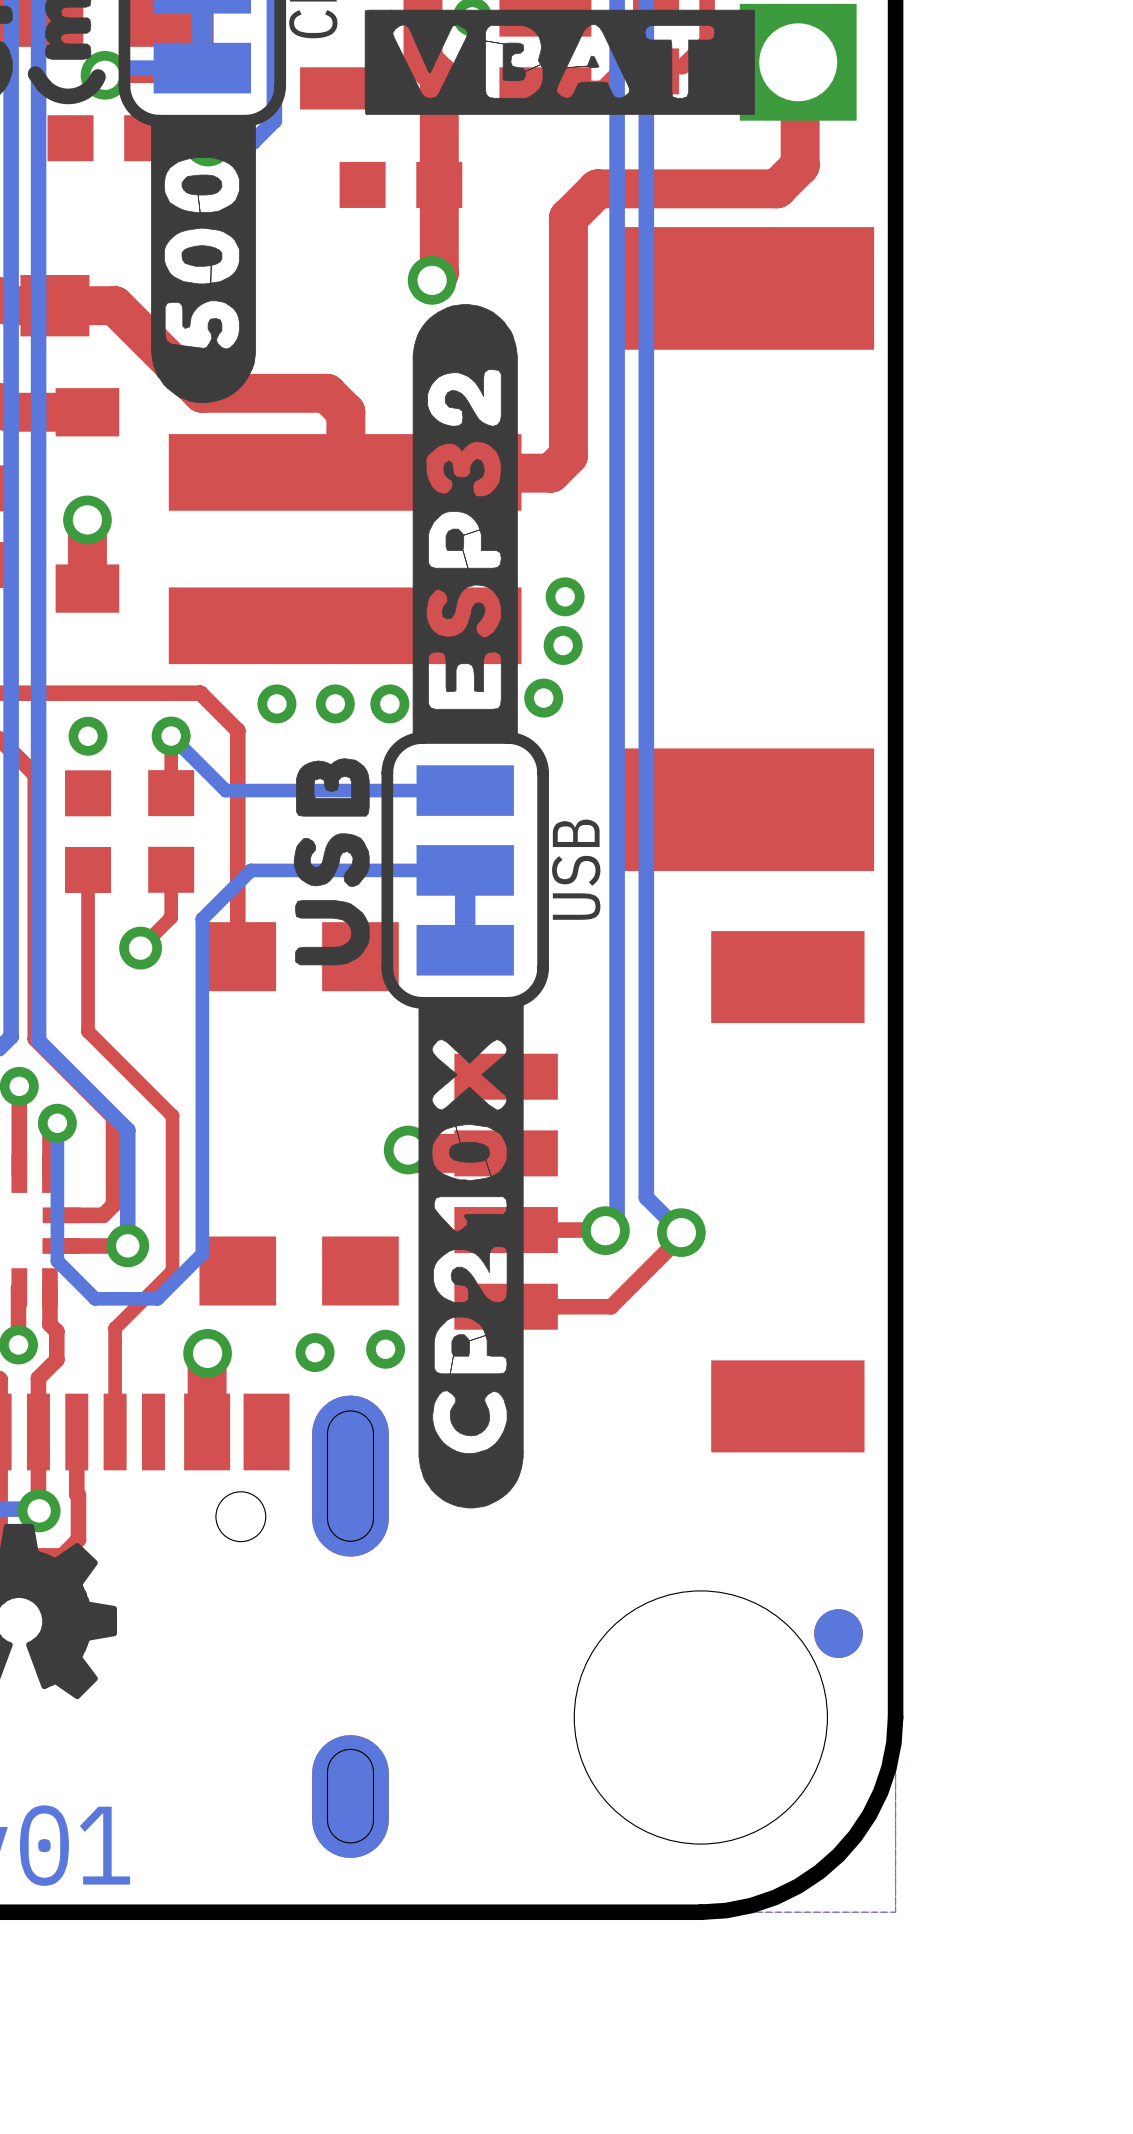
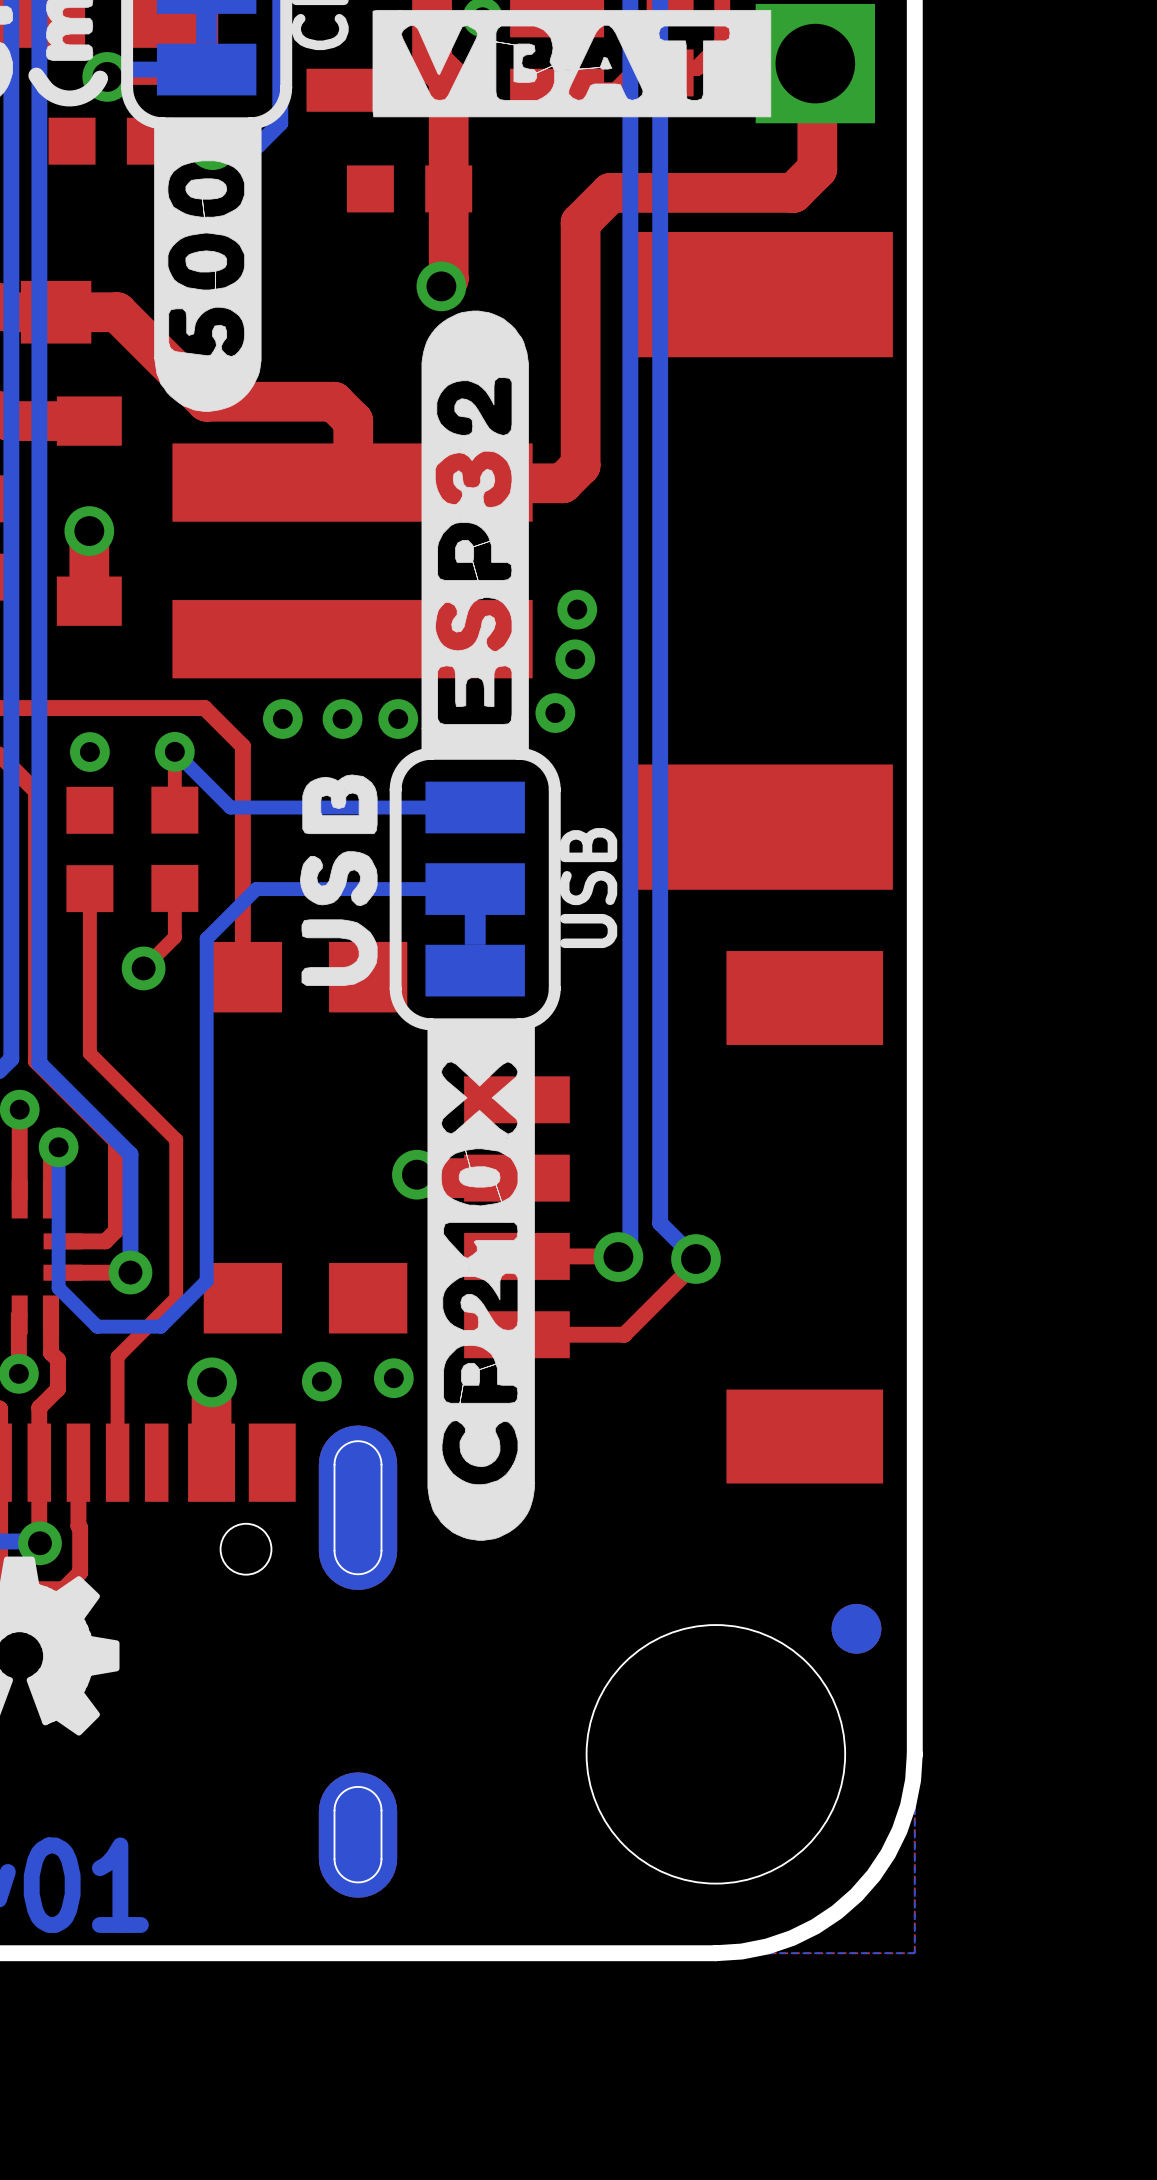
part position: (838, 1633) -> (856, 1628)

